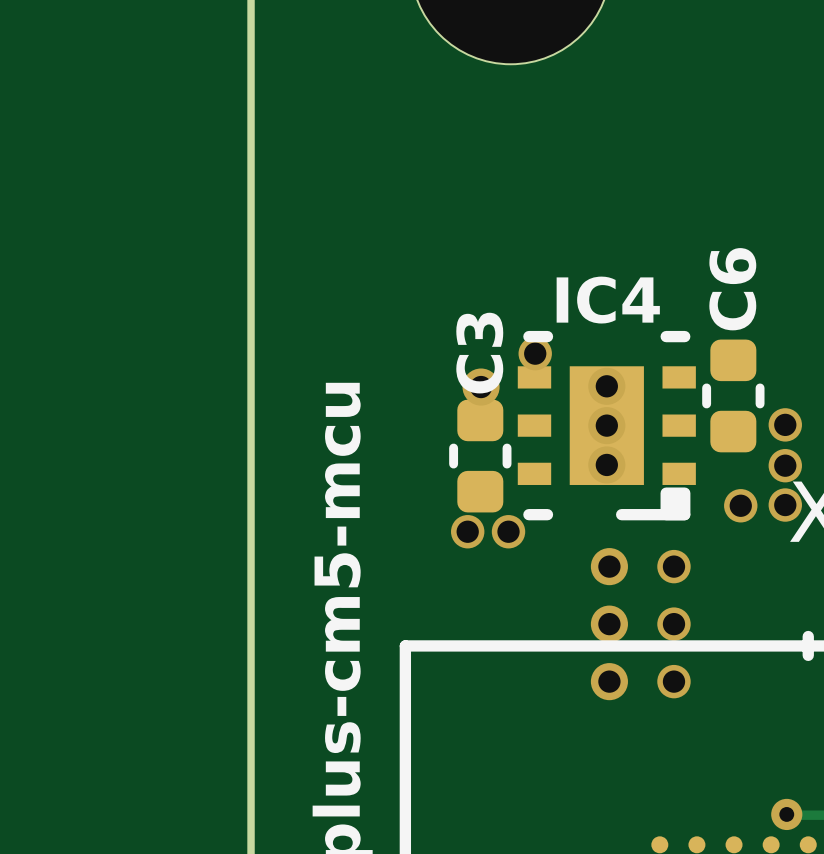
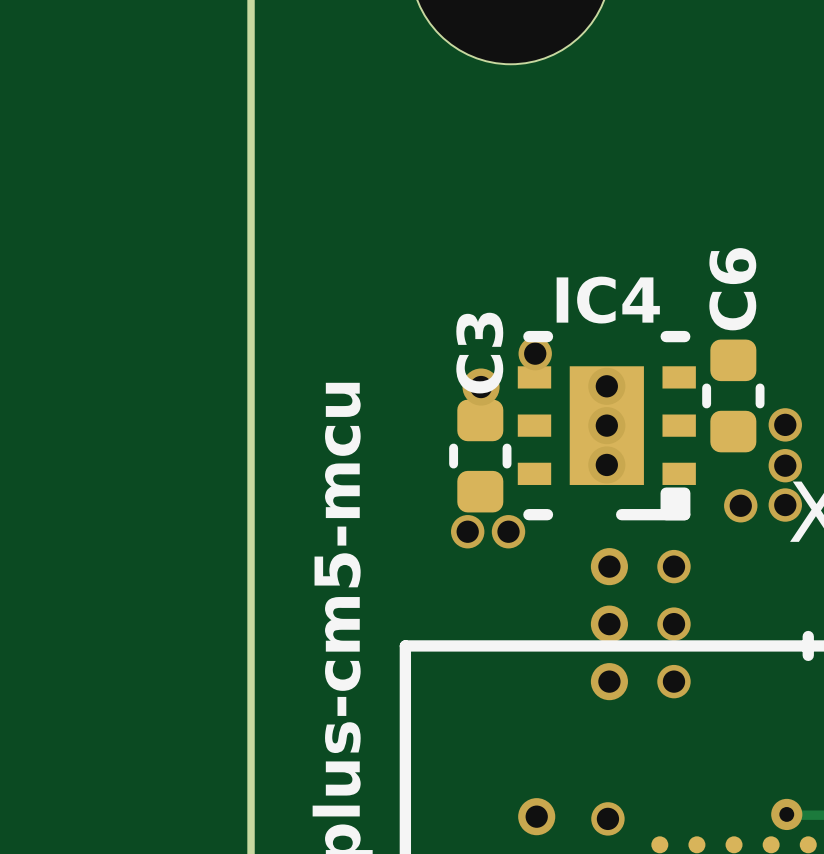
via: none -> (536, 816)
via: none -> (607, 818)

